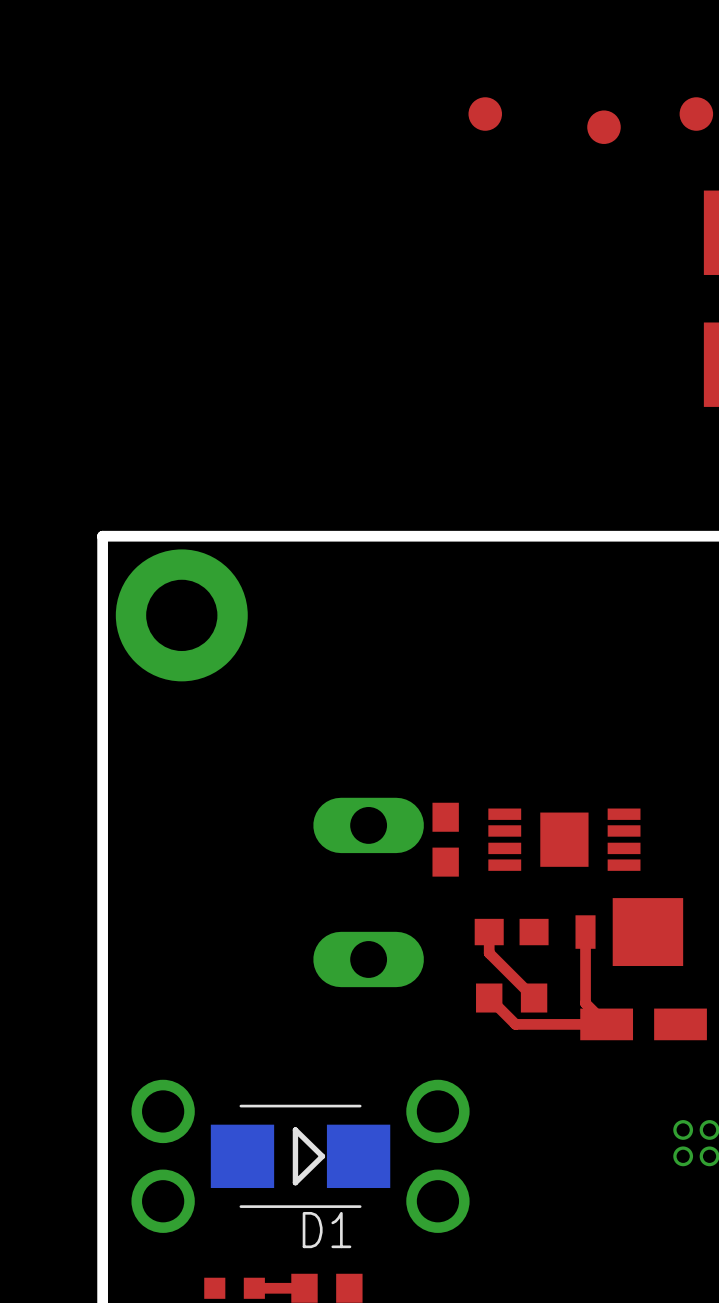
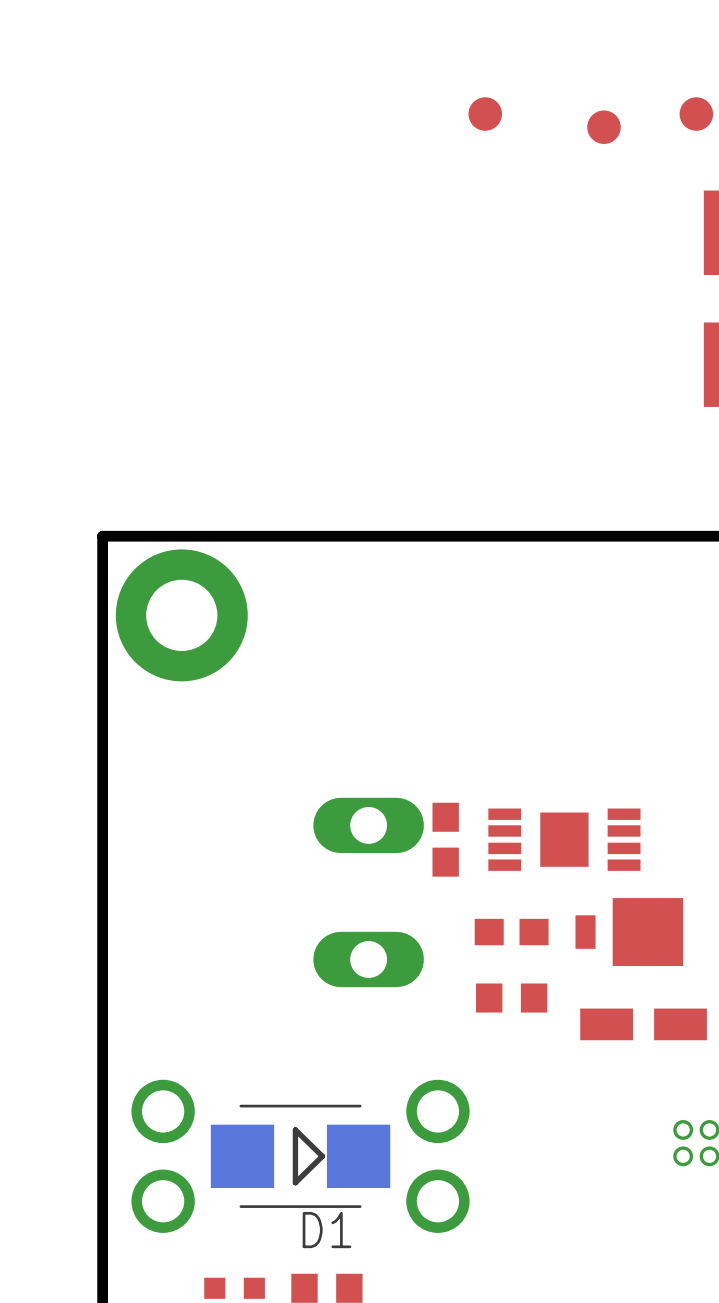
top track: (489, 932) (489, 953) (534, 998) -> none
top track: (585, 932) (585, 1003) (606, 1024) (515, 1024) (489, 998) -> none
top track: (304, 1288) (254, 1288) -> none

